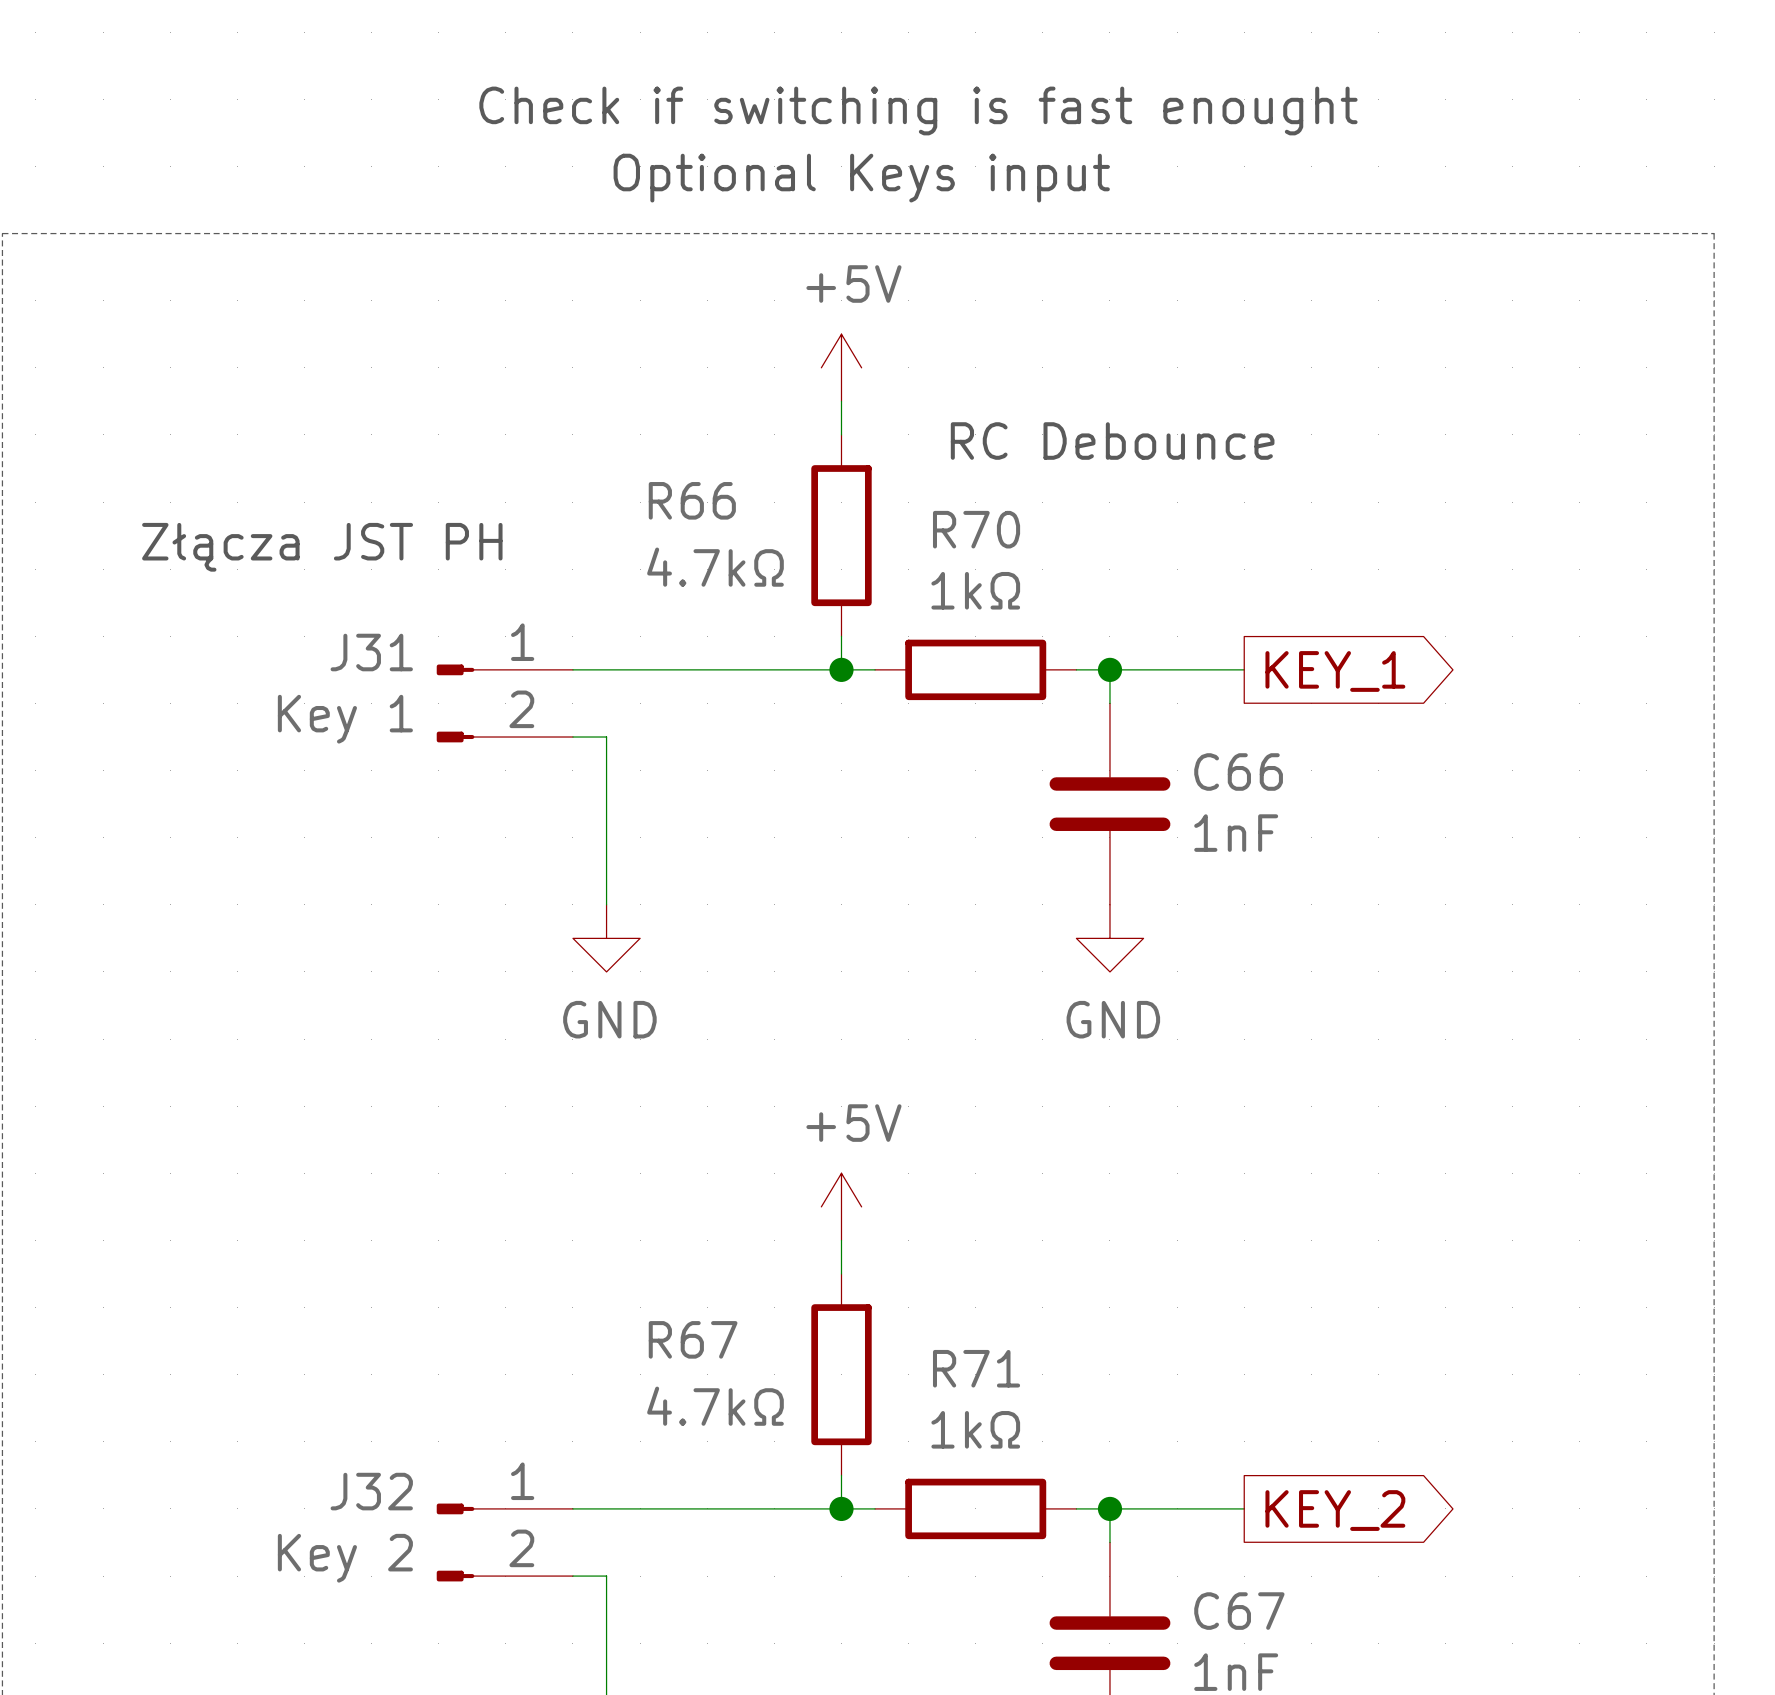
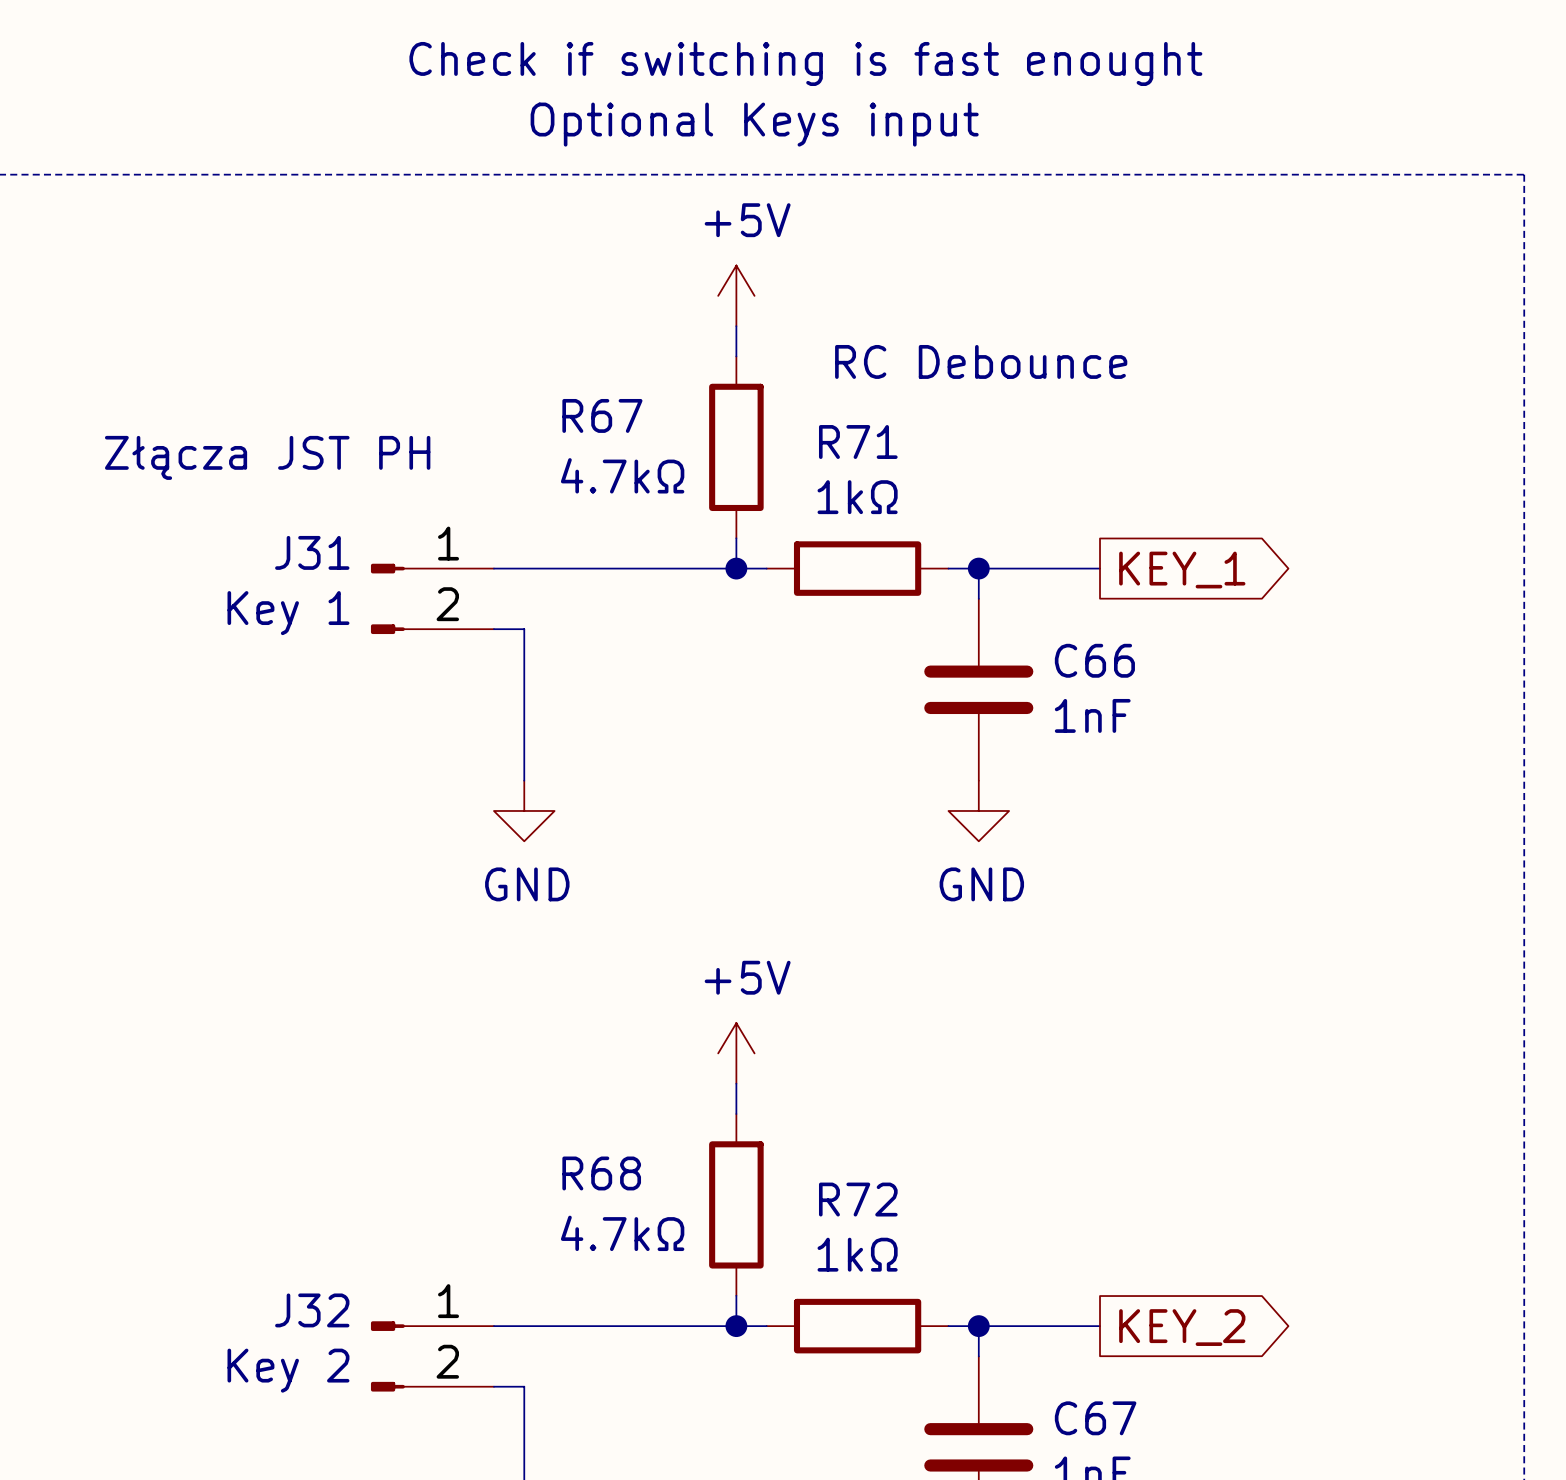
R66 name: R66 (692, 500) -> R67 (602, 415)
R70 name: R70 (976, 529) -> R71 (858, 442)
R67 name: R67 (693, 1339) -> R68 (601, 1173)
R71 name: R71 (976, 1368) -> R72 (858, 1199)

